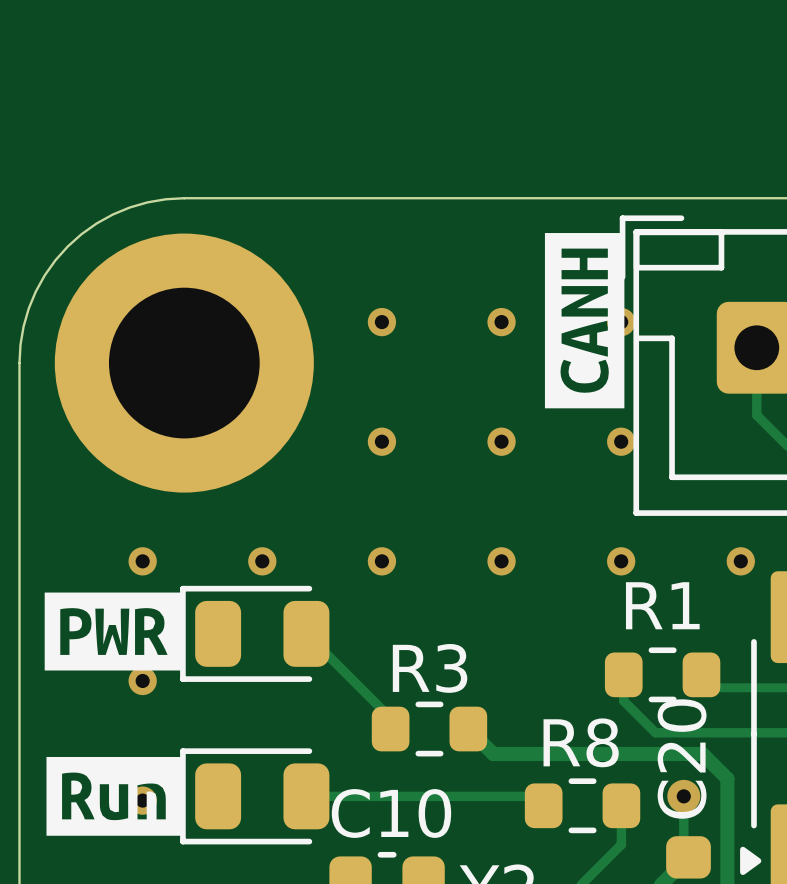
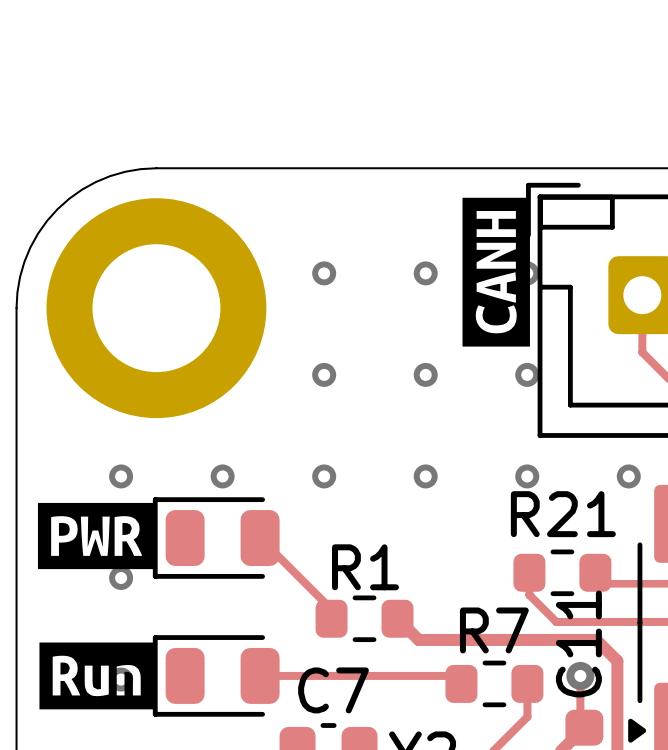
R1 name: R1 (662, 605) -> R21 (563, 514)
R3 name: R3 (430, 668) -> R1 (365, 567)
R8 name: R8 (581, 742) -> R7 (494, 630)
C20 name: C20 (682, 759) -> C11 (578, 643)
C10 name: C10 (391, 813) -> C7 (333, 690)

